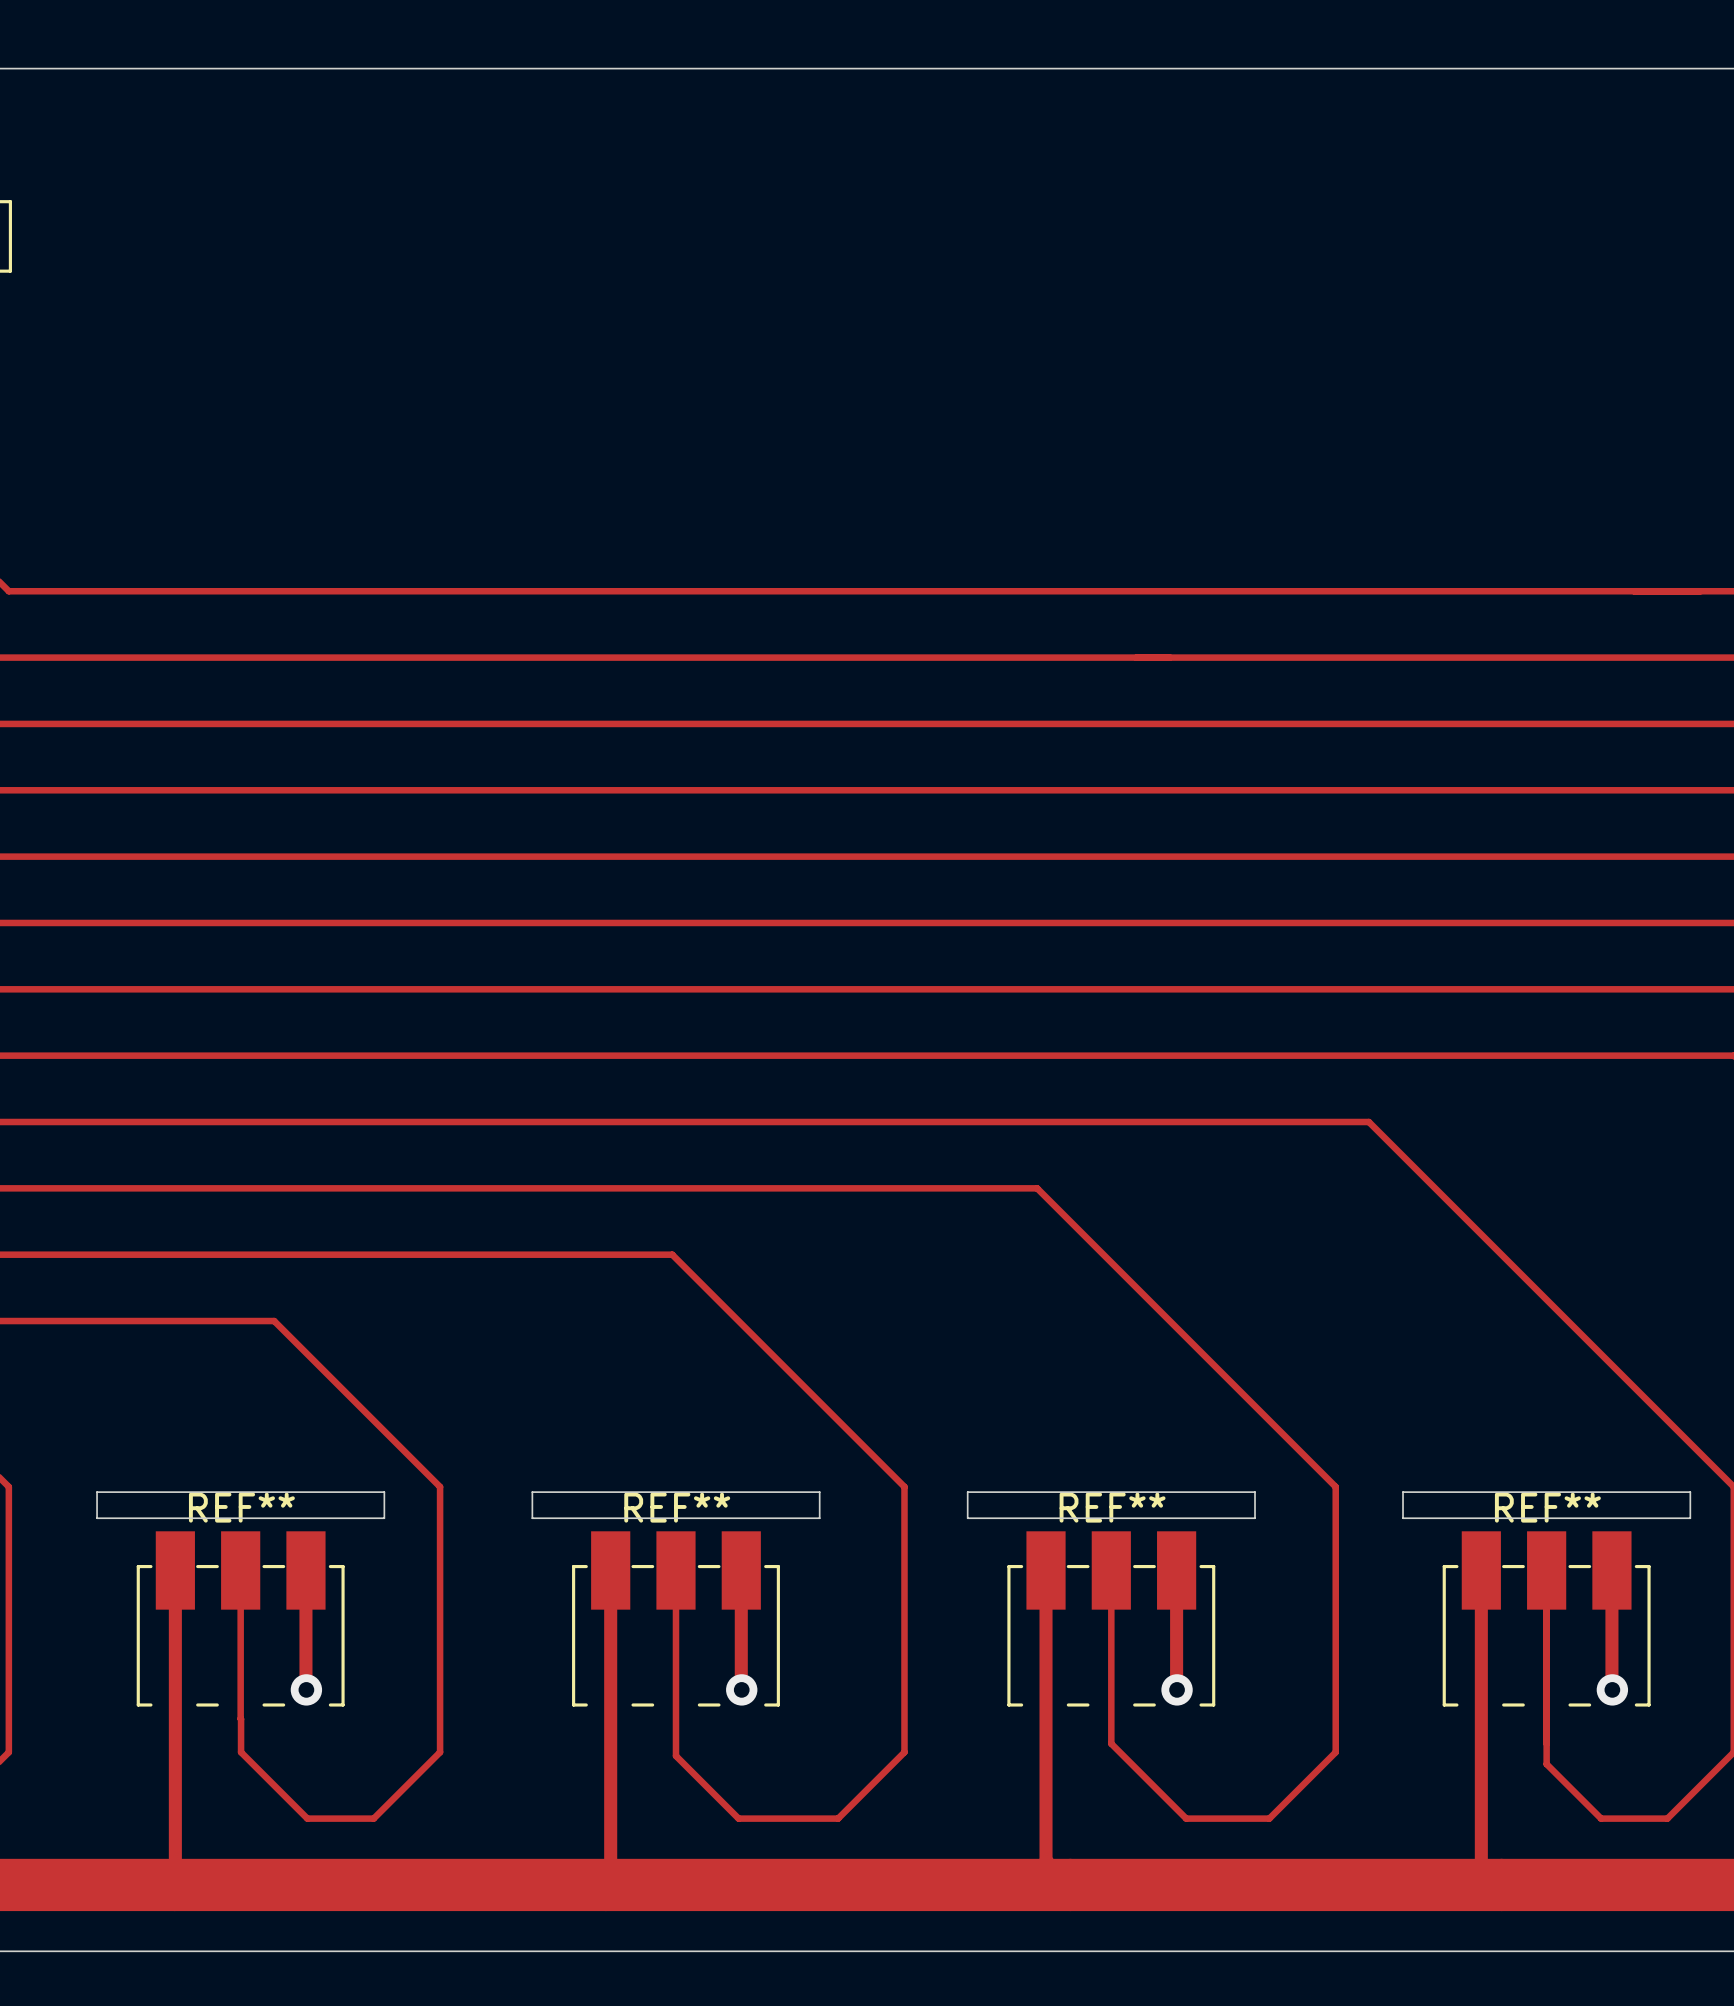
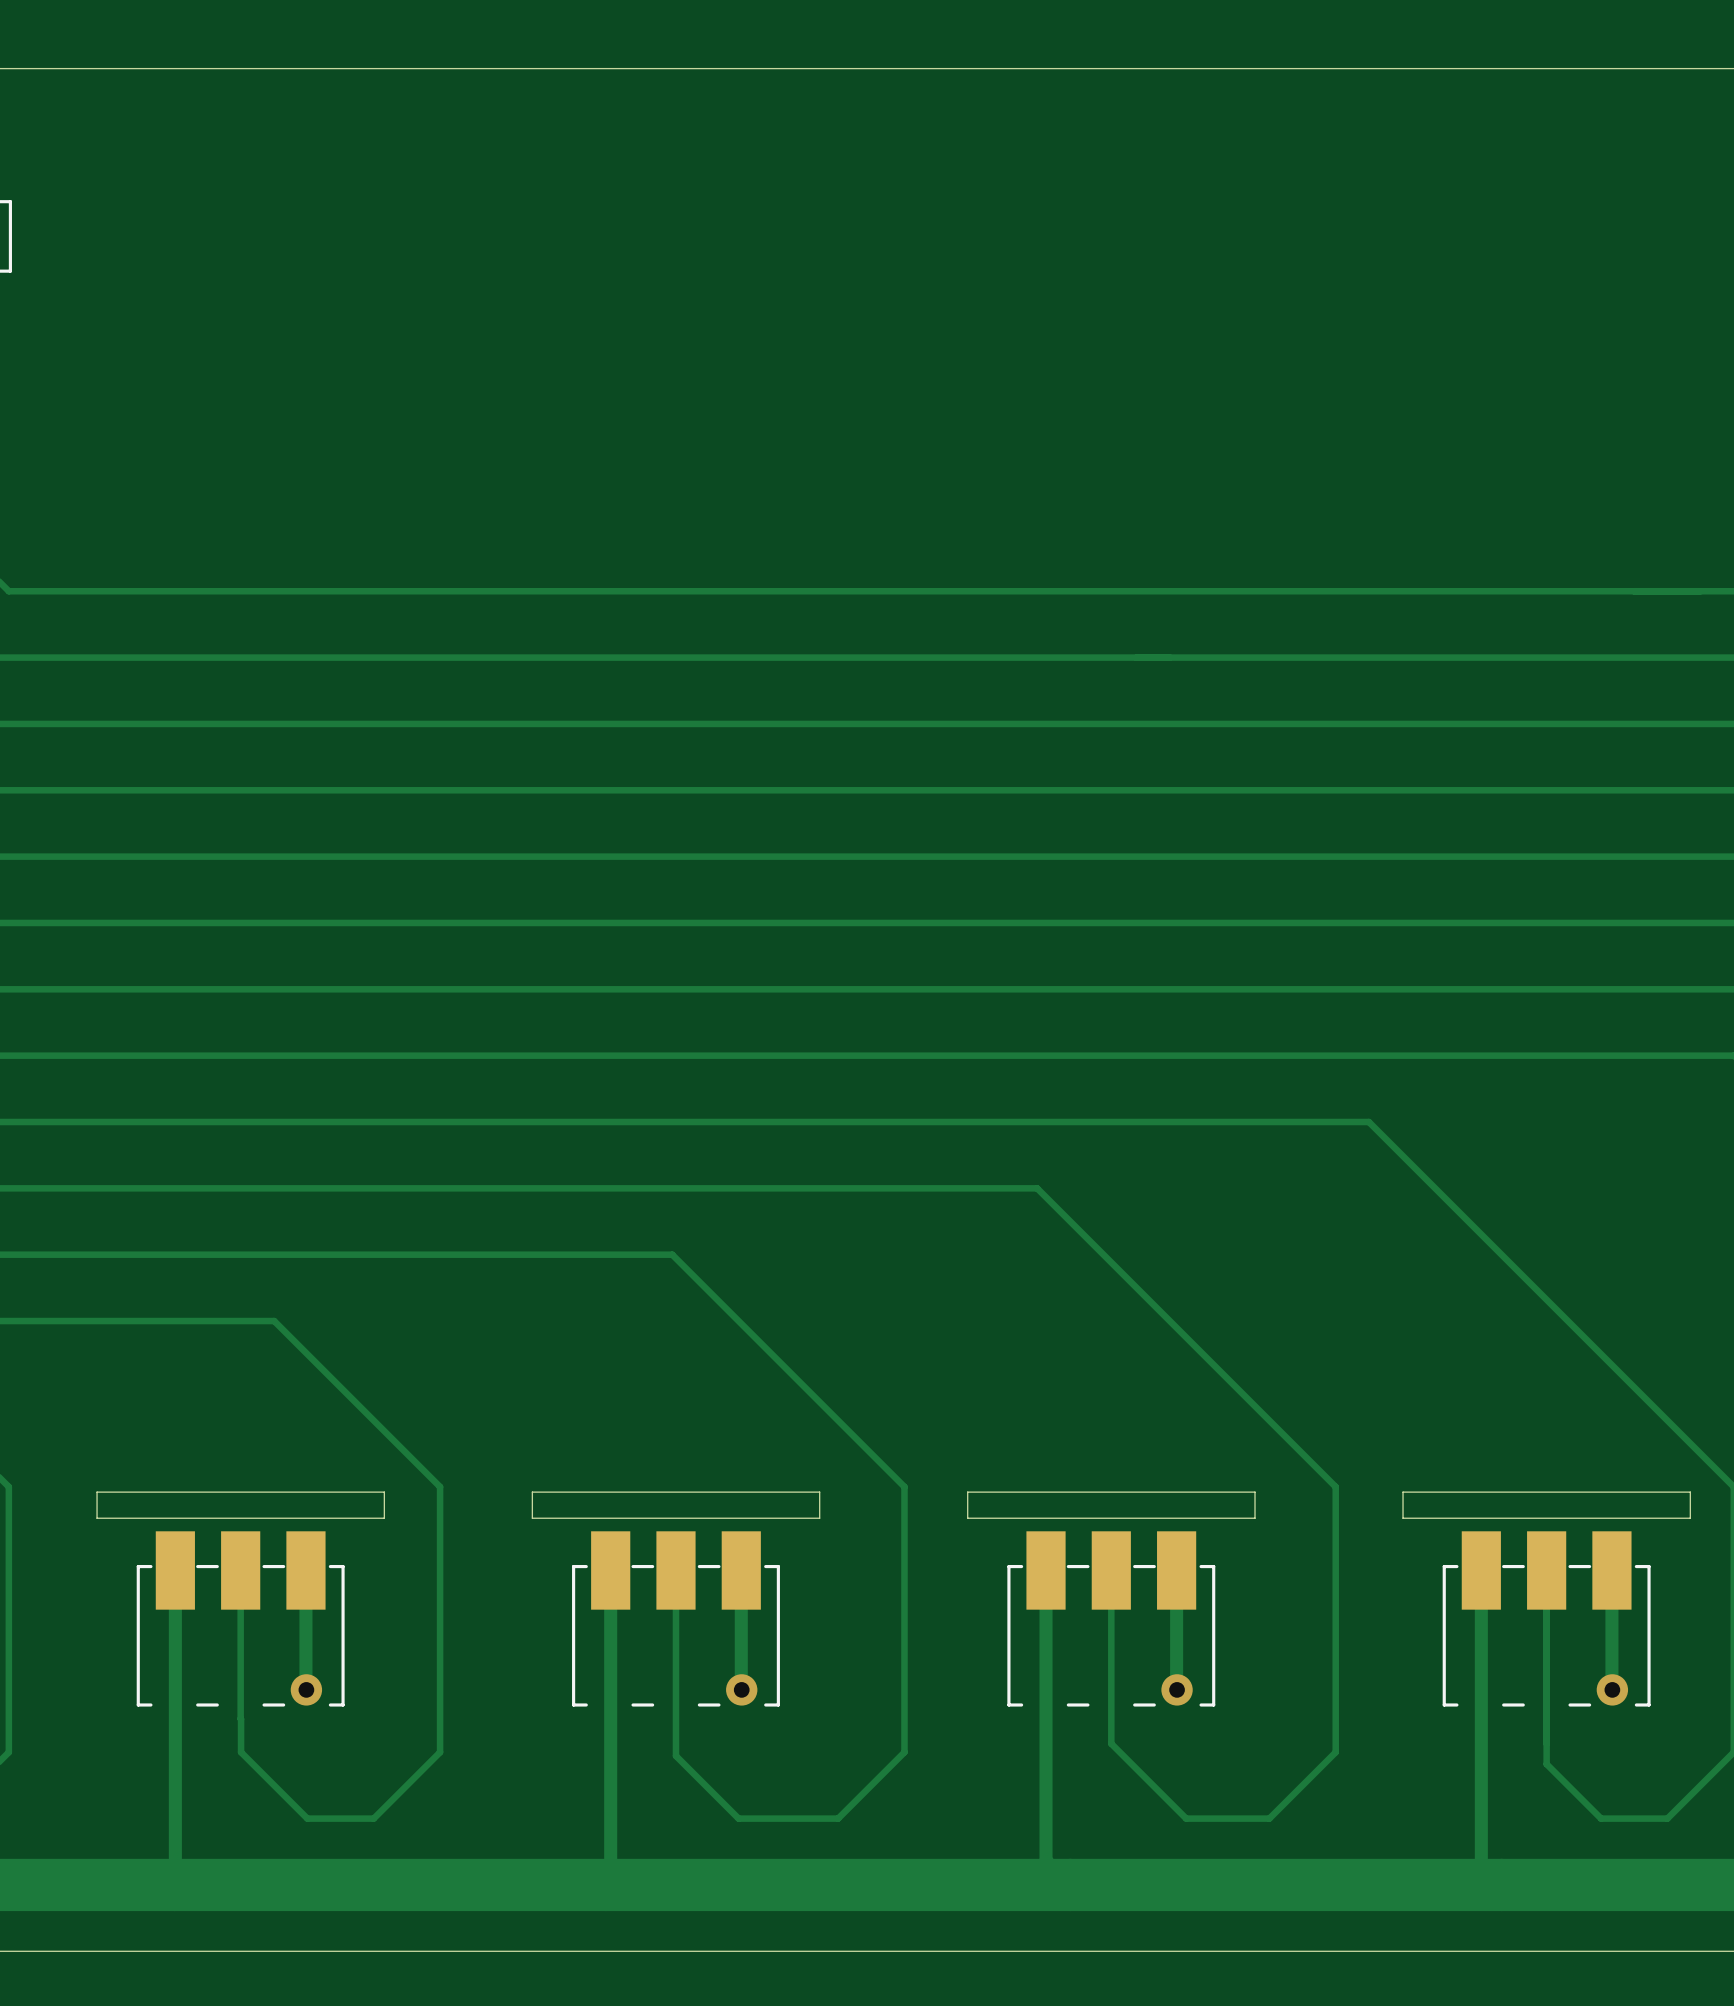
REF** name: REF** (241, 1507) -> none
REF** name: REF** (677, 1507) -> none
REF** name: REF** (1112, 1507) -> none
REF** name: REF** (1547, 1507) -> none

